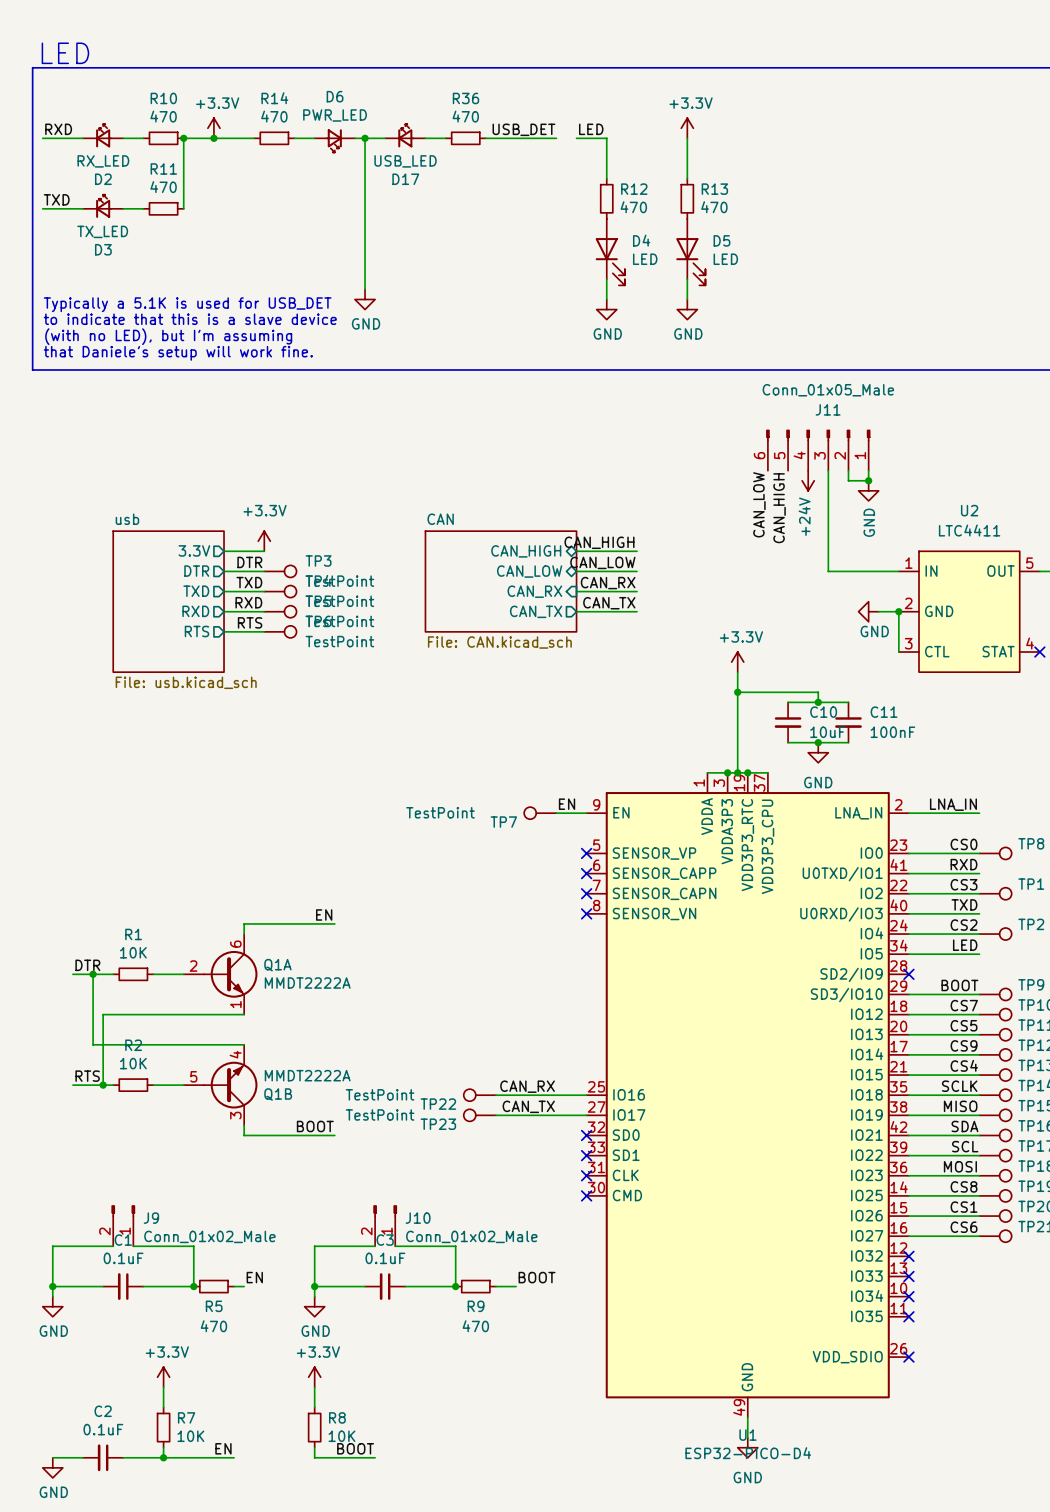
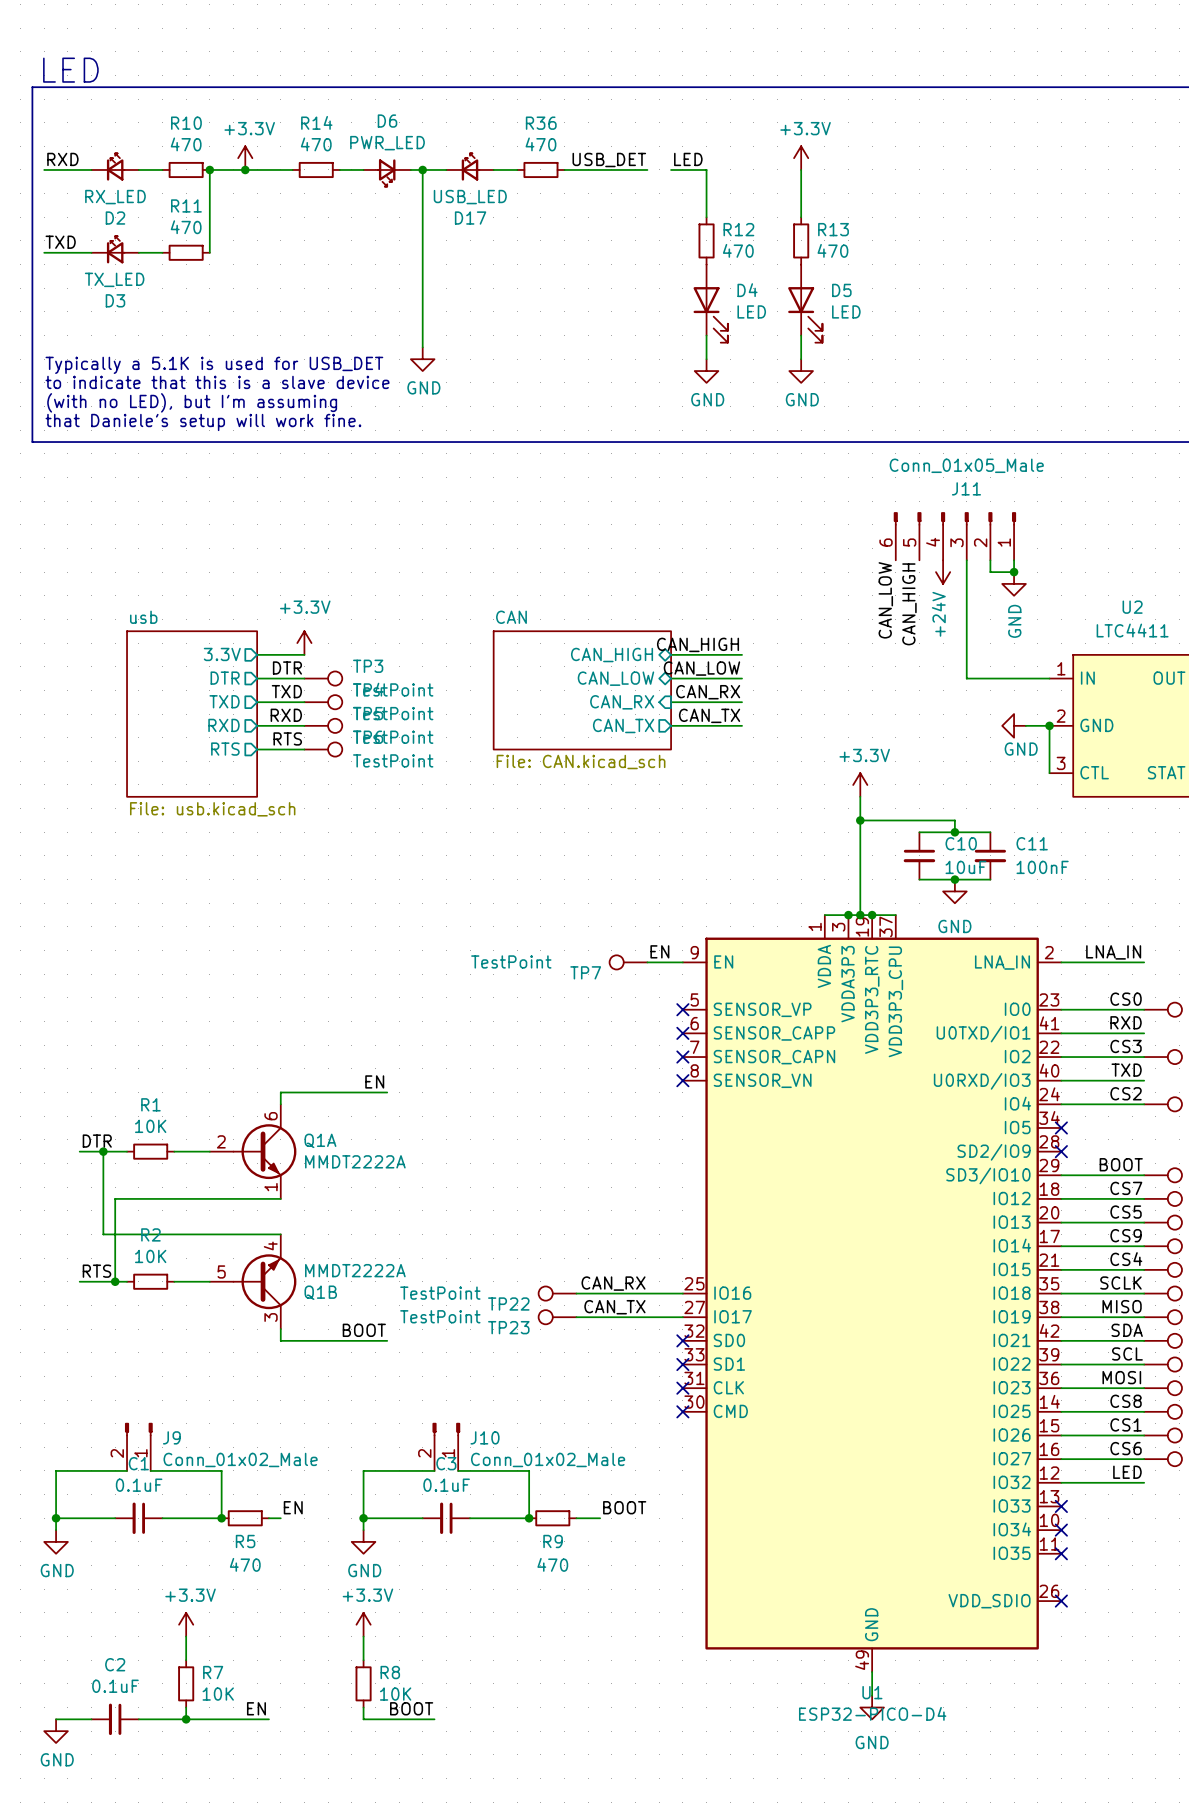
label: LED (965, 945) -> none
wire: (908, 954) (979, 954) -> none
no-connect mark: none -> (1061, 1127)
label: none -> LED (1127, 1472)
wire: none -> (1061, 1482) (1144, 1482)
no-connect mark: (908, 1256) -> none

